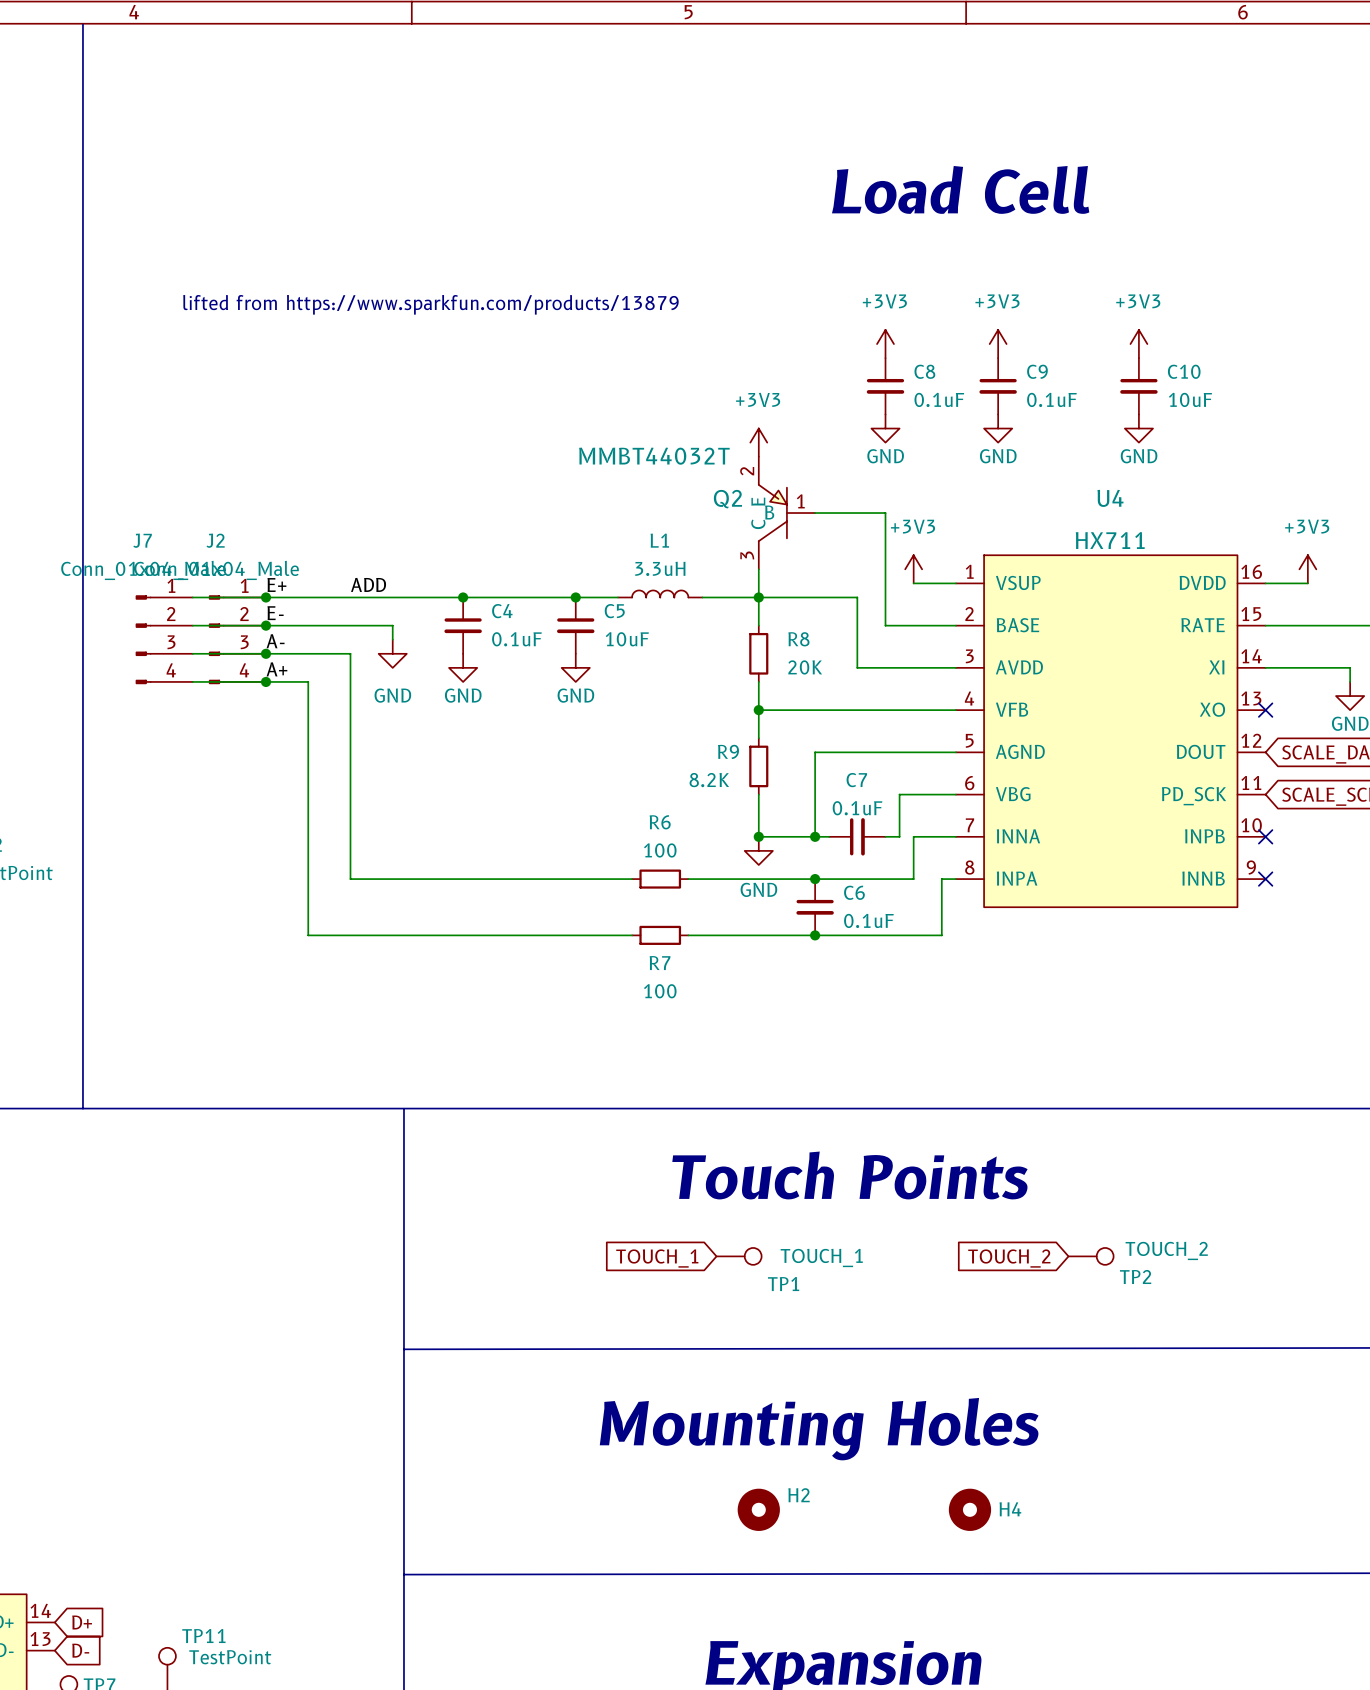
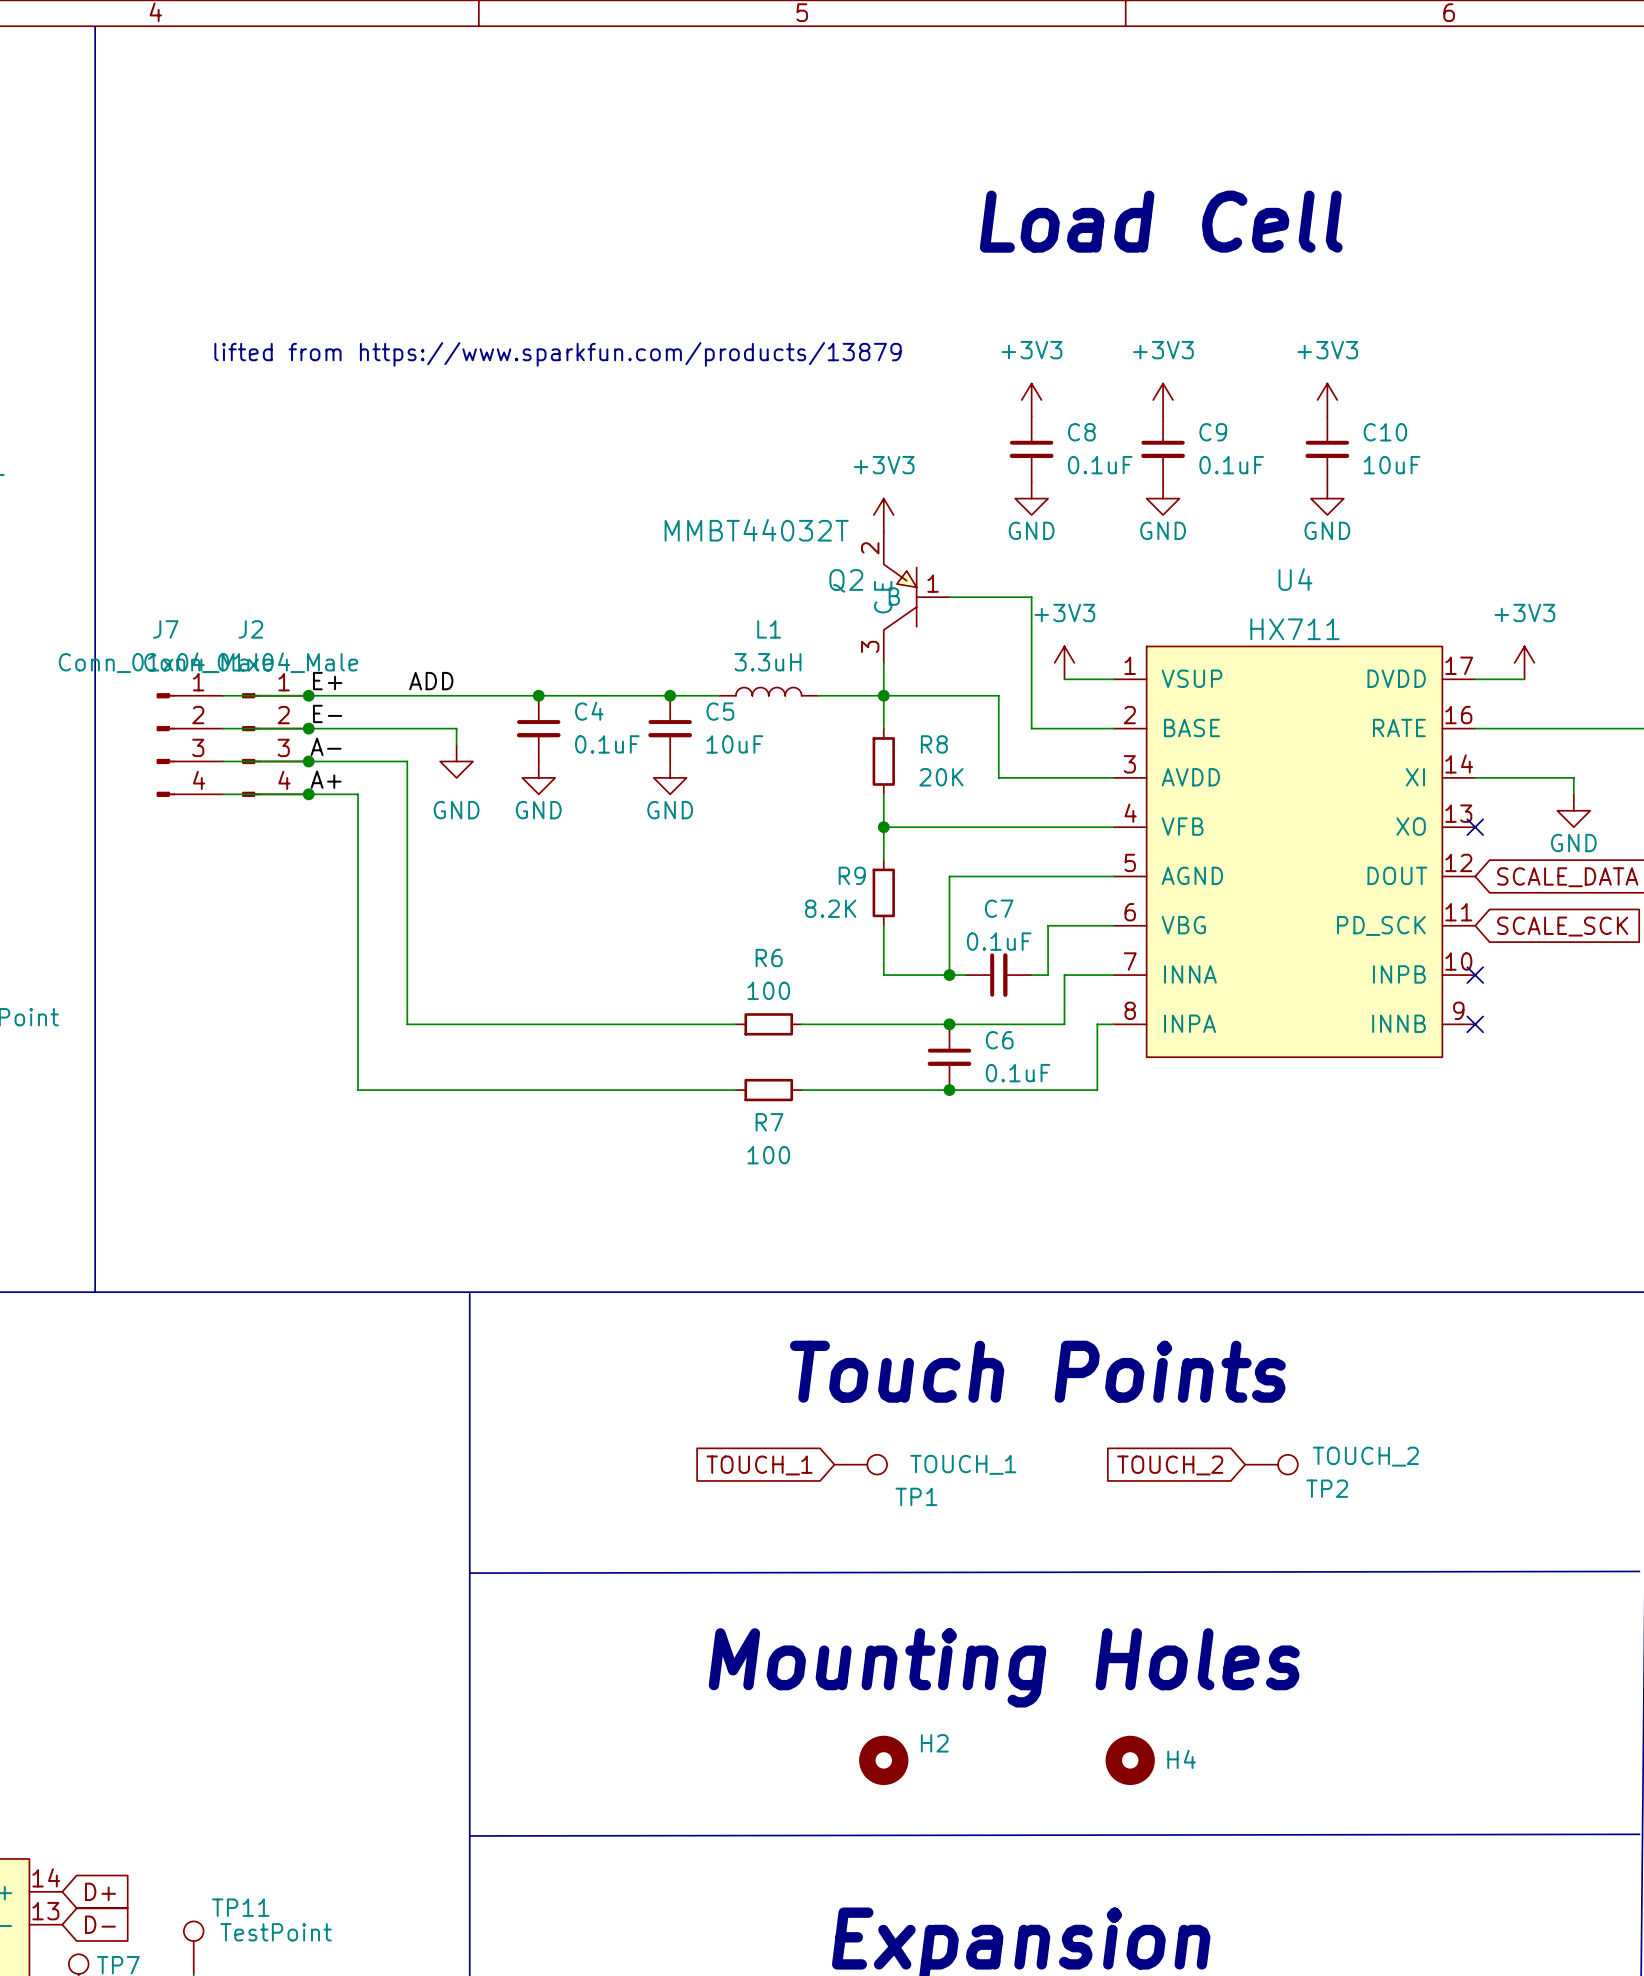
U4 pin number: 16 (1251, 571) -> 17 (1459, 665)
U4 pin number: 15 (1251, 614) -> 16 (1458, 715)
junction: (758, 836) -> none
power symbol: GND (758, 850) -> none

